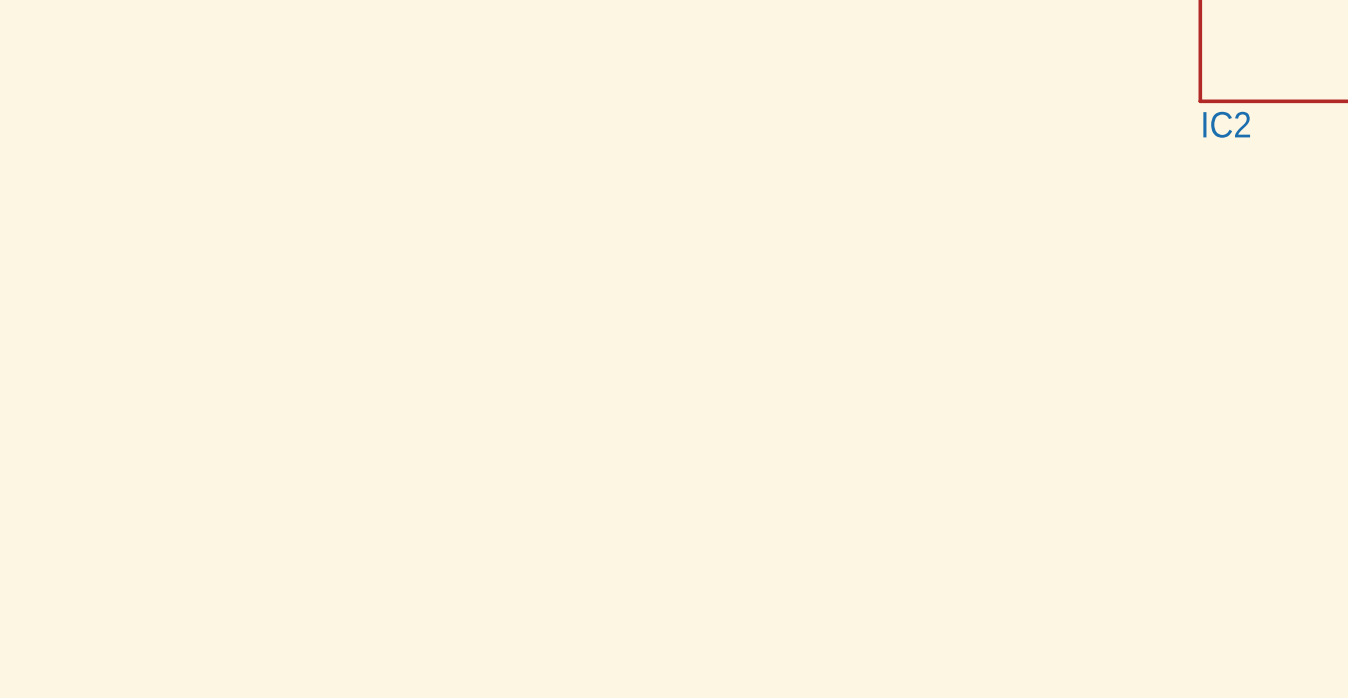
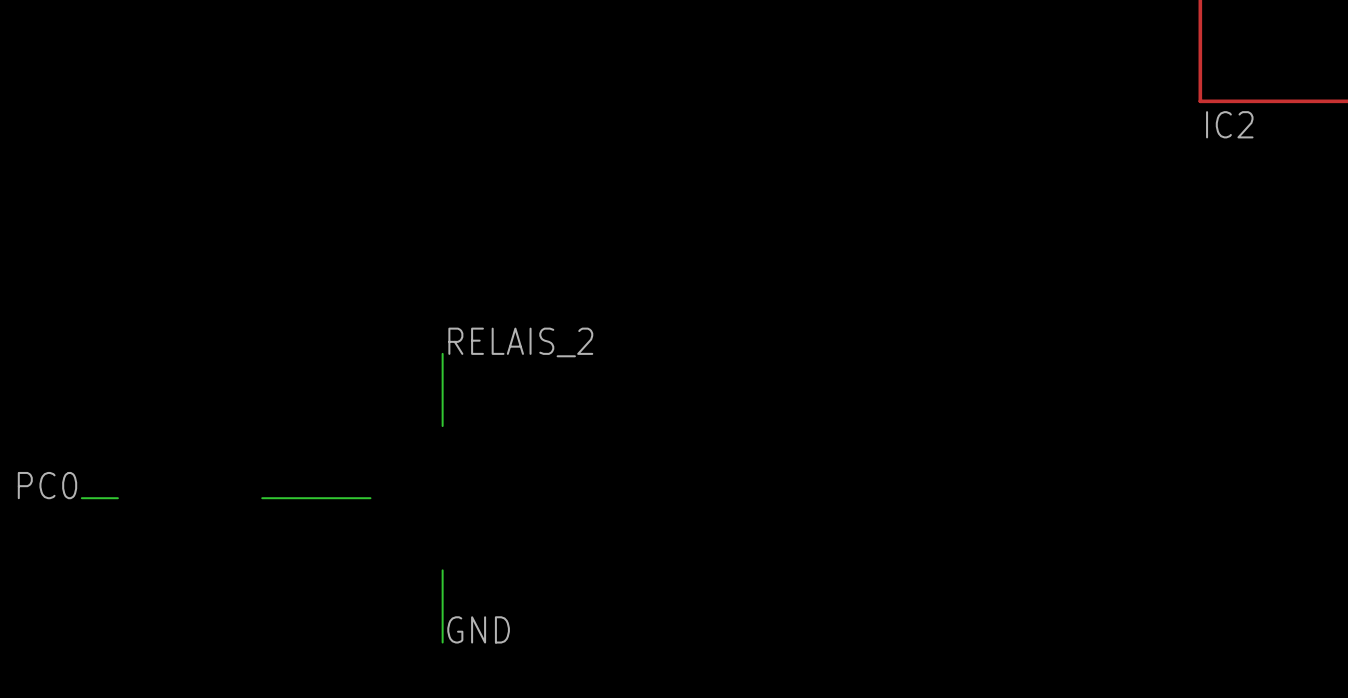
label: none -> RELAIS_2 (520, 342)
wire: none -> (442, 353) (442, 426)
label: none -> PC0 (47, 485)
wire: none -> (81, 498) (117, 498)
wire: none -> (262, 498) (370, 498)
wire: none -> (442, 570) (442, 642)
label: none -> GND (478, 629)

